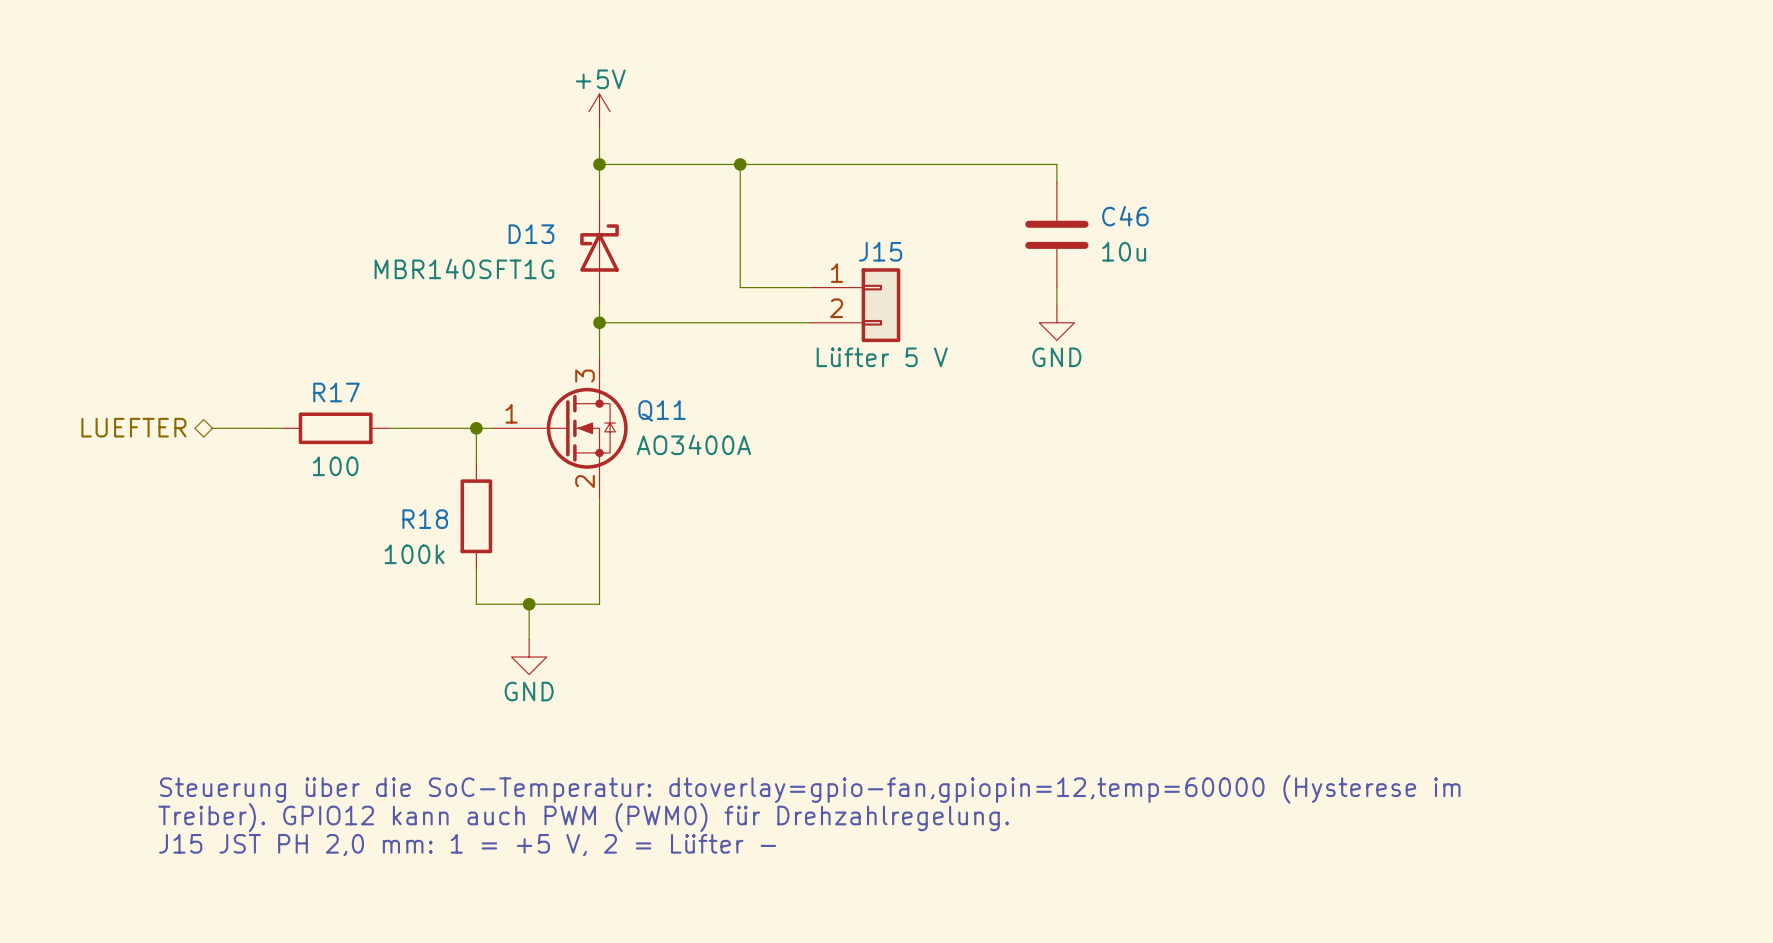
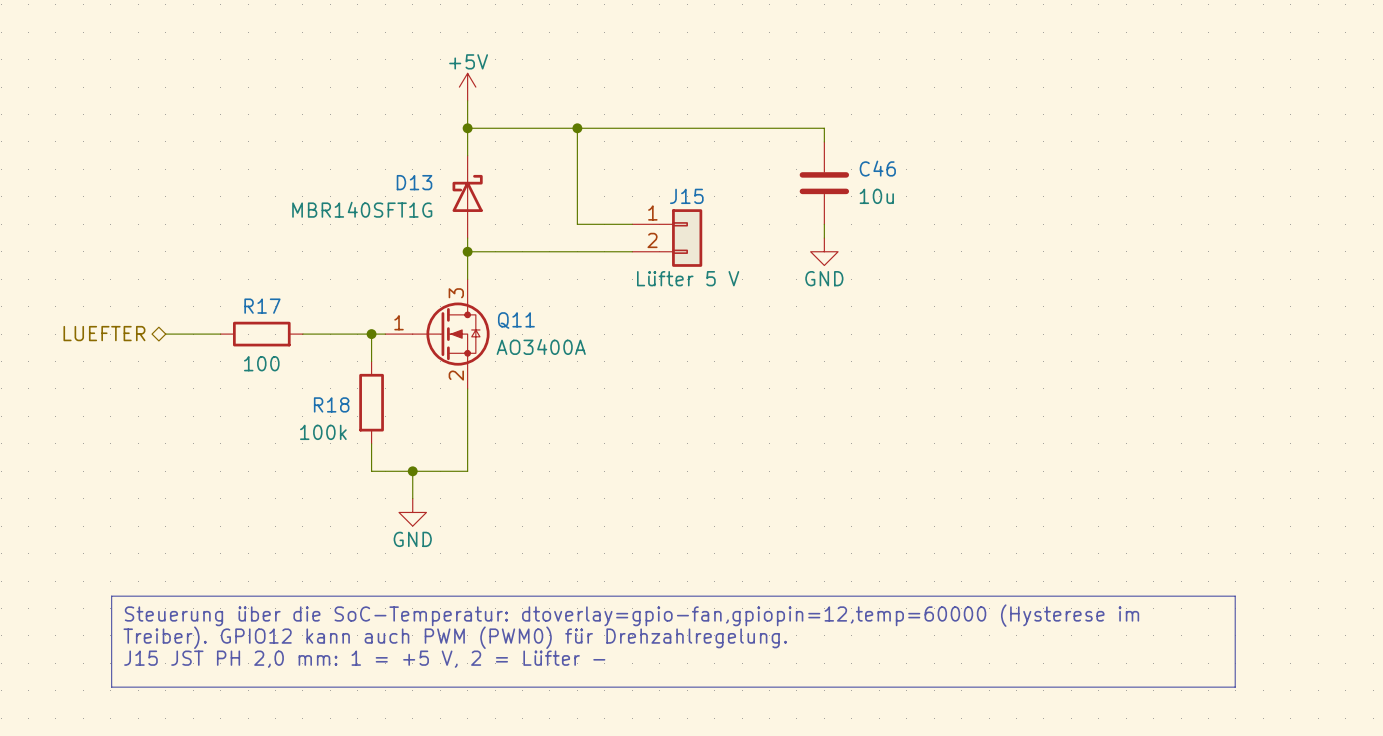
line: none -> (111, 596) (1235, 596) (1235, 687) (111, 687) (111, 596)

